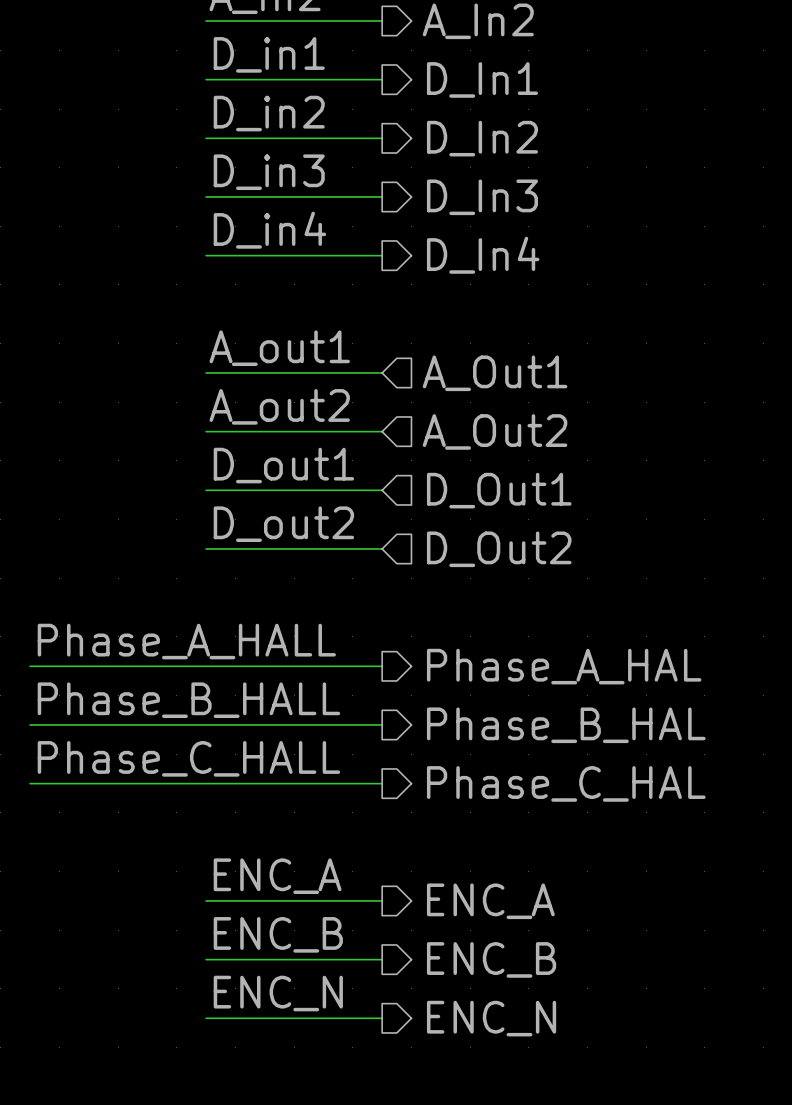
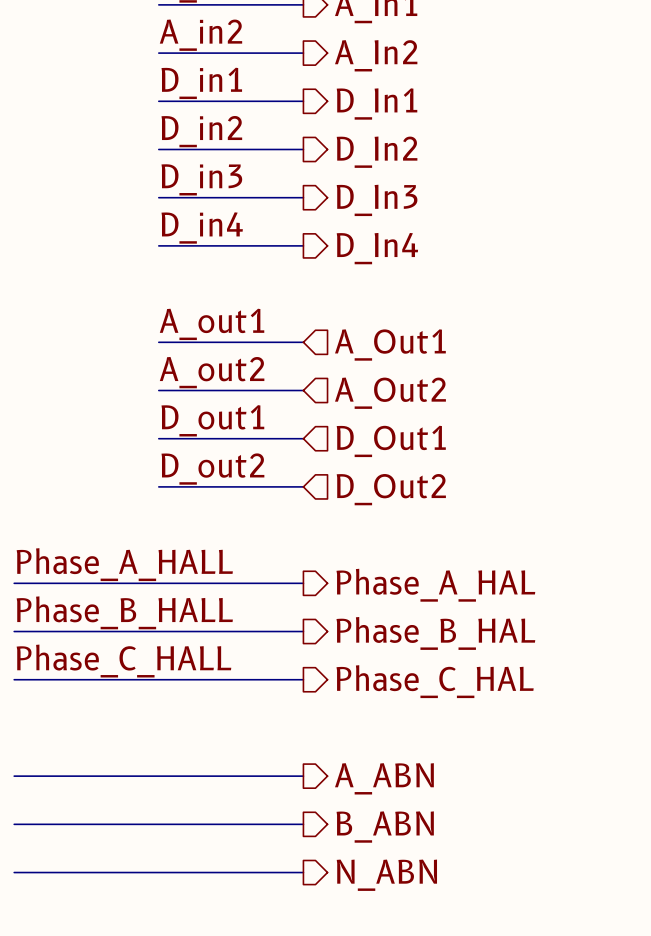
label: ENC_A (277, 876) -> none
wire: none -> (14, 776) (158, 776)
hierarchical label: ENC_A (490, 901) -> A_ABN (384, 778)
label: ENC_B (278, 934) -> none
wire: none -> (14, 824) (158, 824)
hierarchical label: ENC_B (491, 959) -> B_ABN (385, 827)
label: ENC_N (278, 993) -> none
wire: none -> (14, 872) (158, 872)
hierarchical label: ENC_N (491, 1018) -> N_ABN (386, 875)

